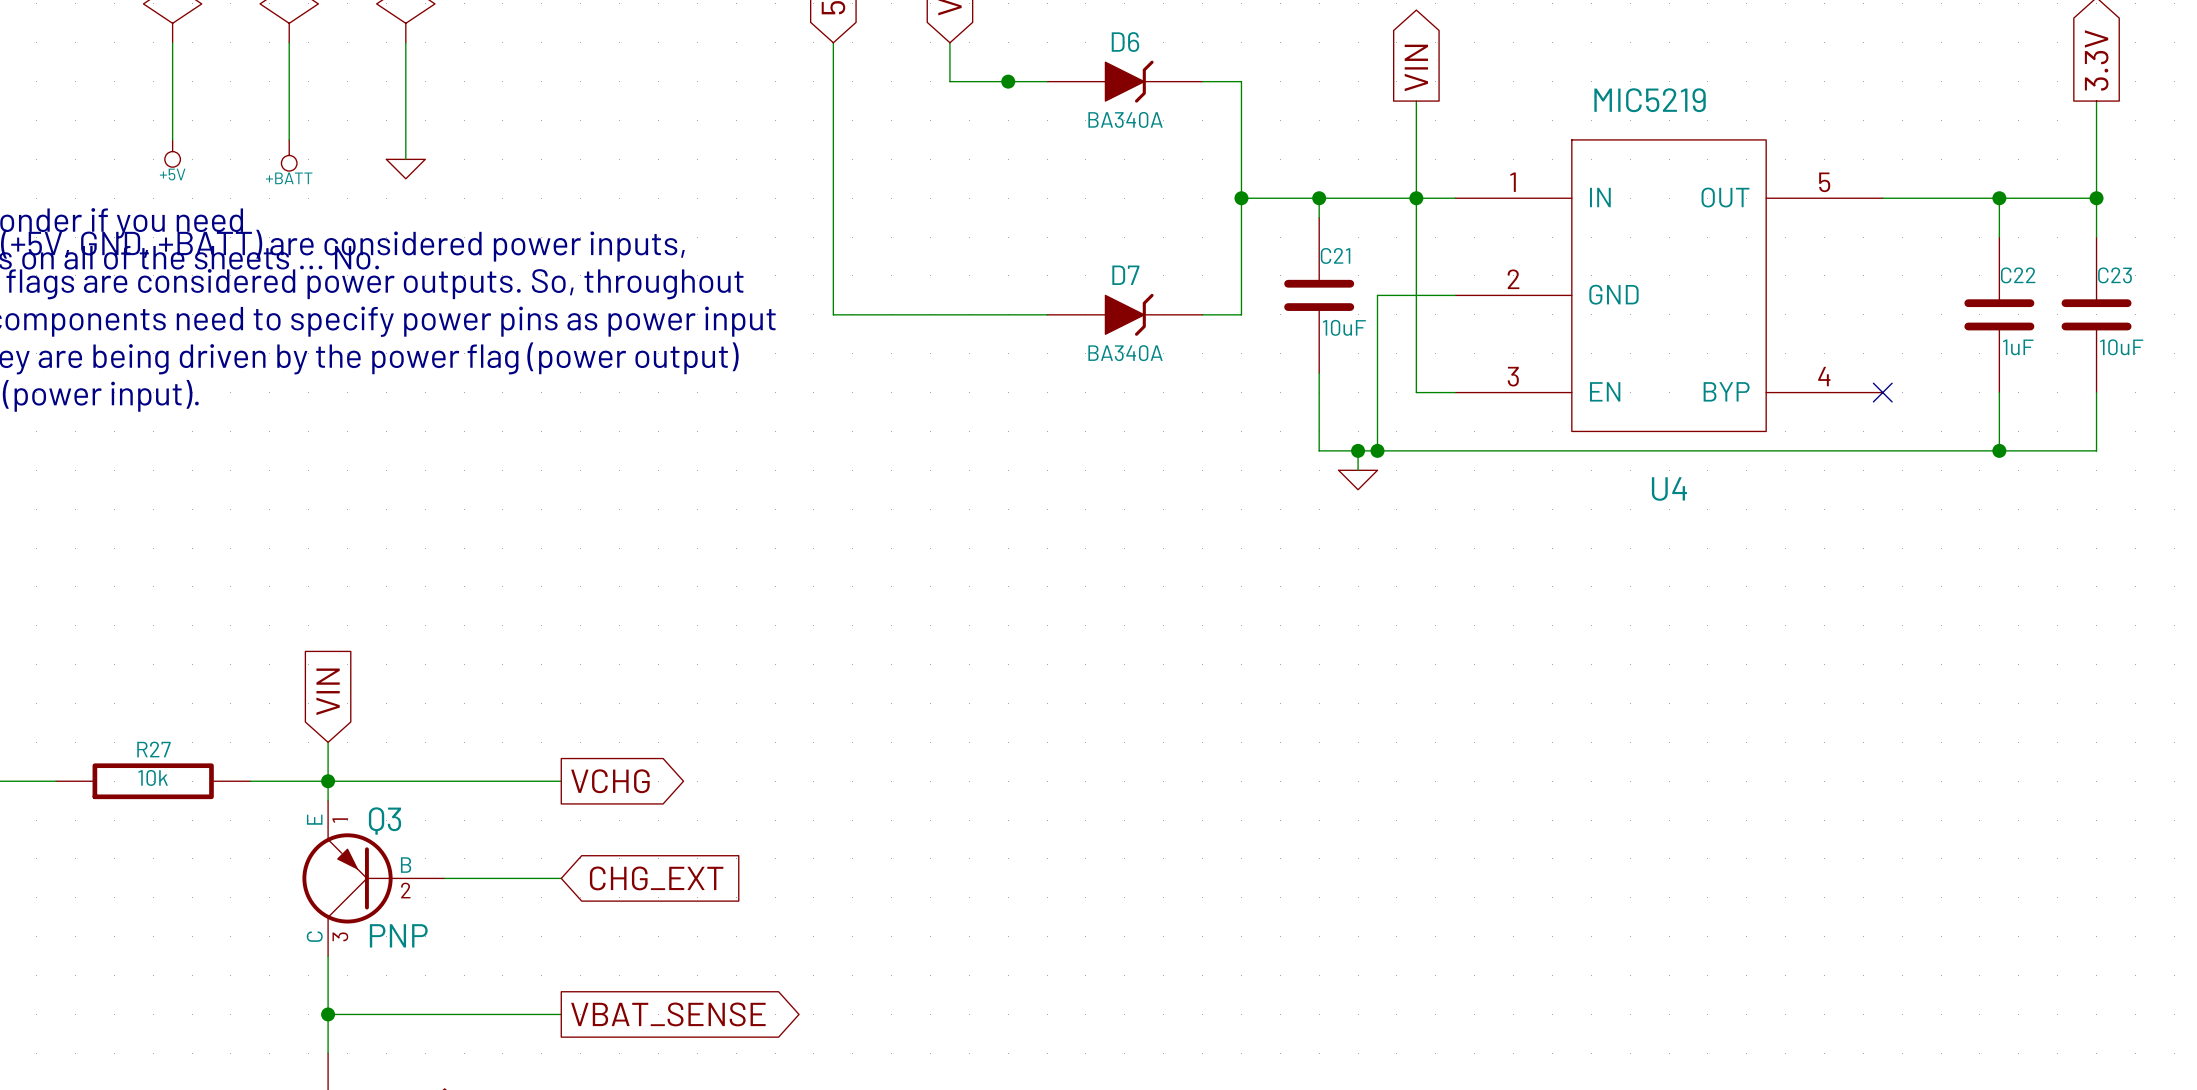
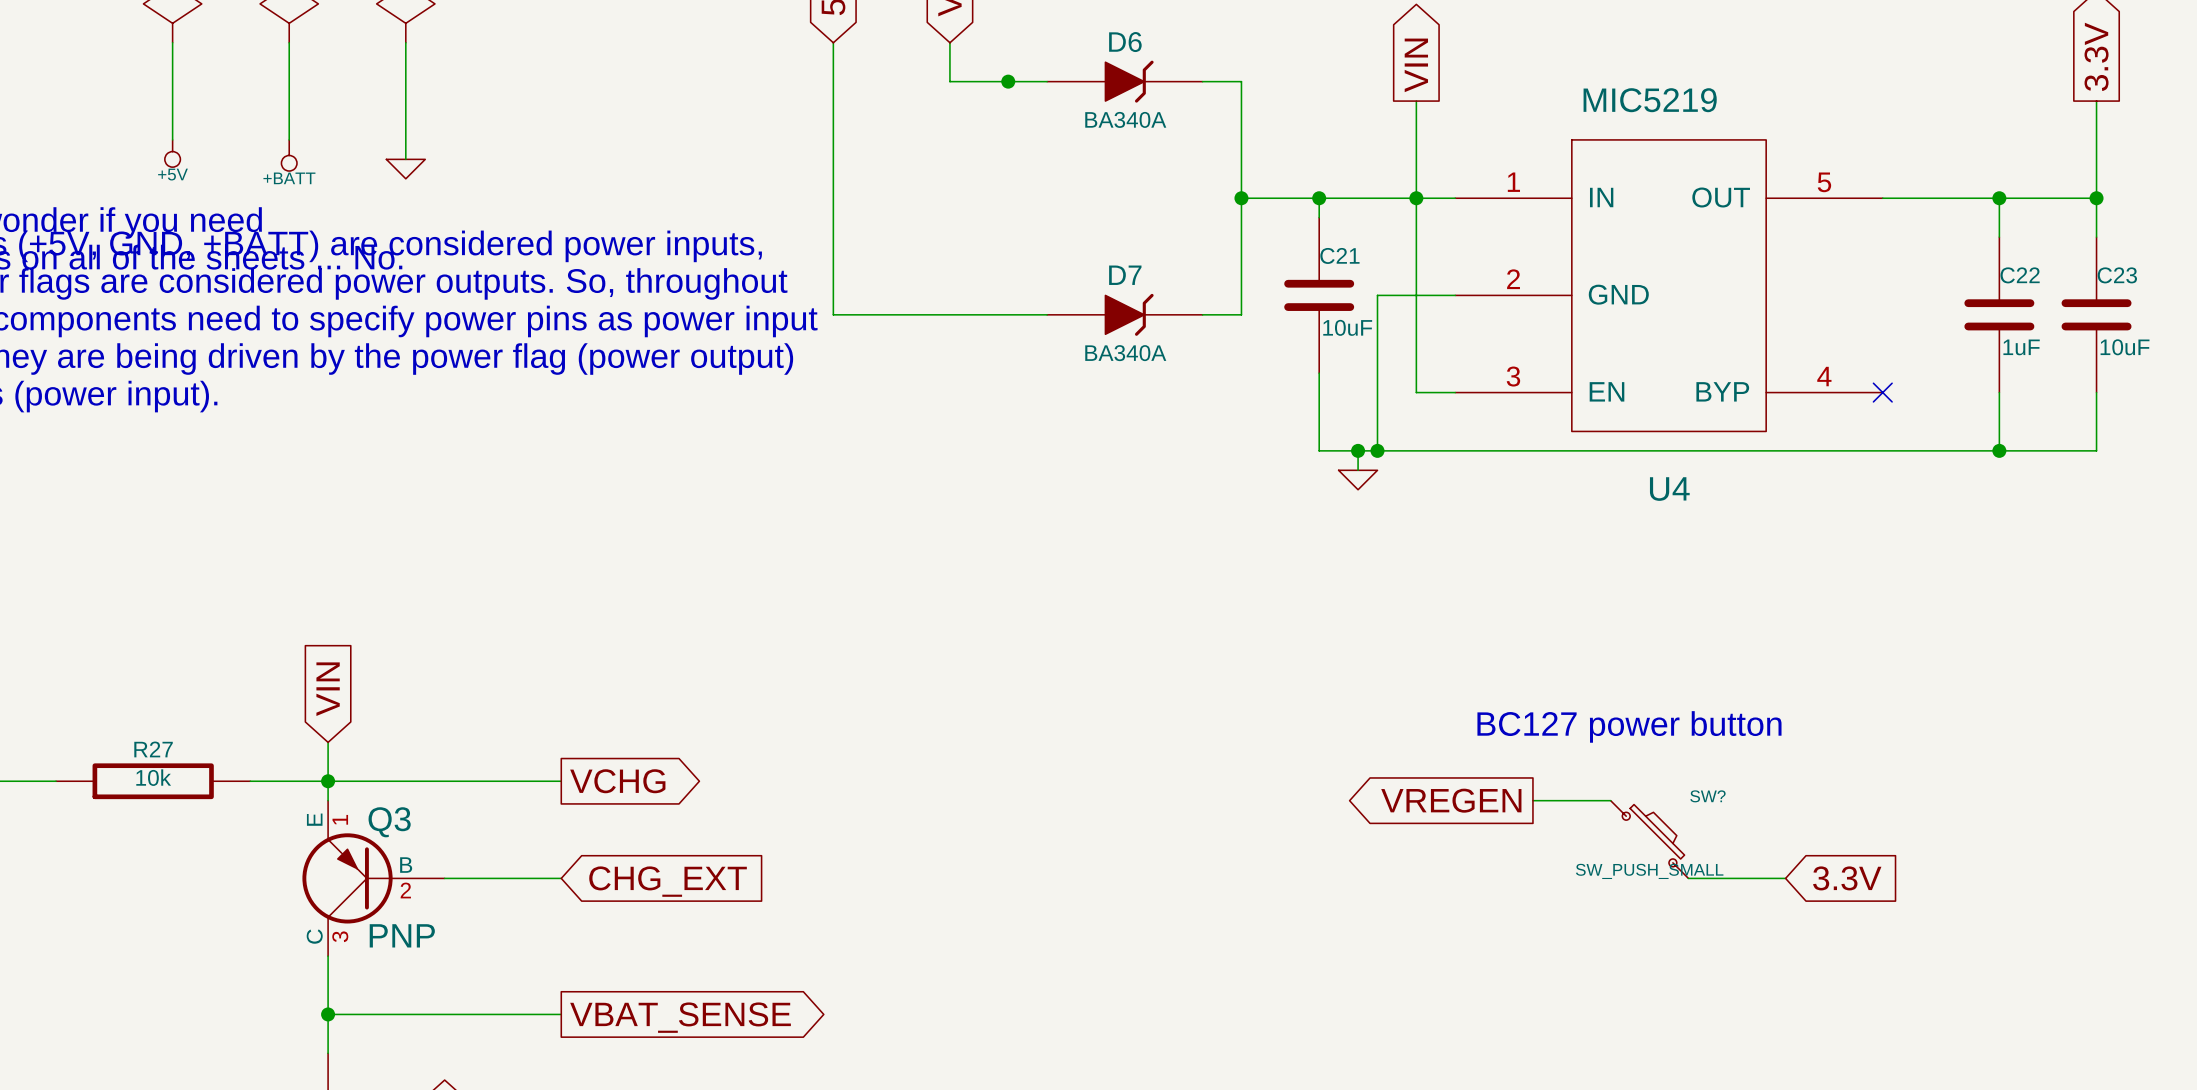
text: none -> BC127 power button (1629, 726)
global label: none -> VREGEN (1451, 800)
wire: none -> (1532, 800) (1610, 800)
SW?: none -> SW_PUSH_SMALL (1649, 839)
wire: none -> (1688, 878) (1785, 878)
global label: none -> 3.3V (1847, 878)

